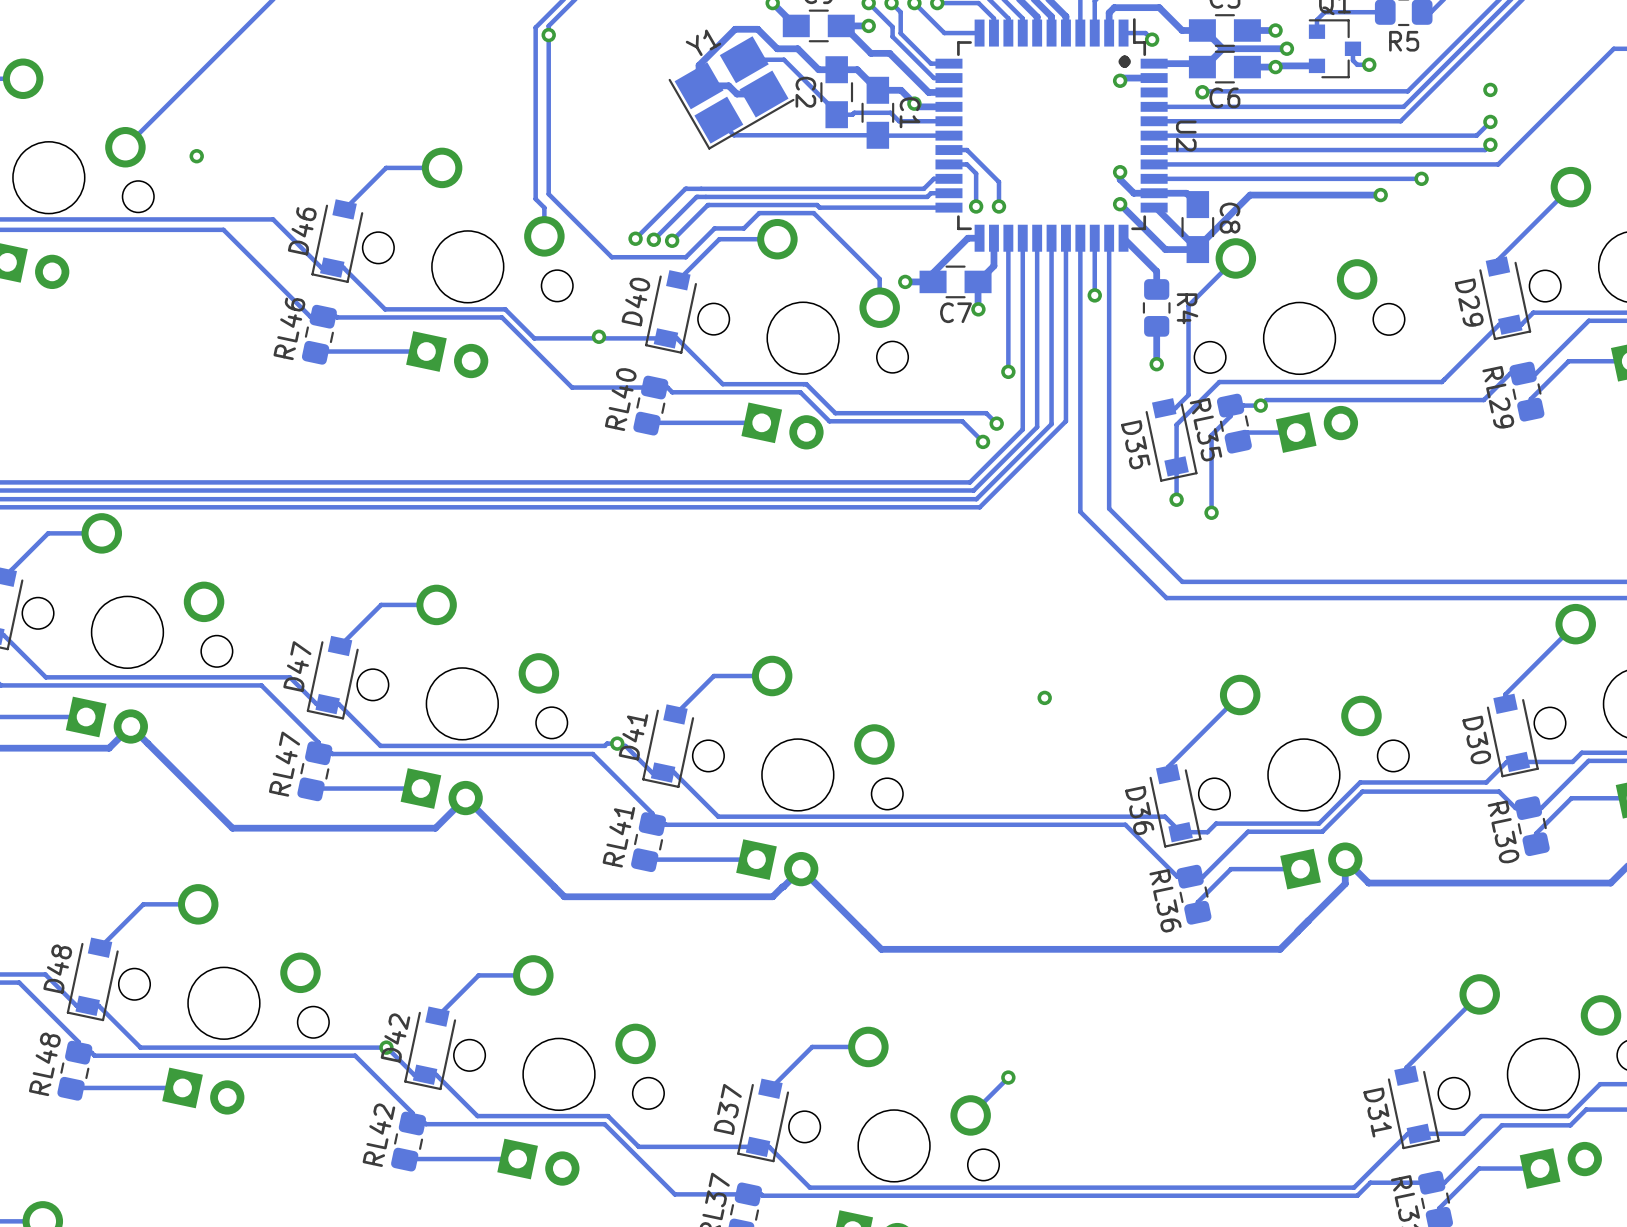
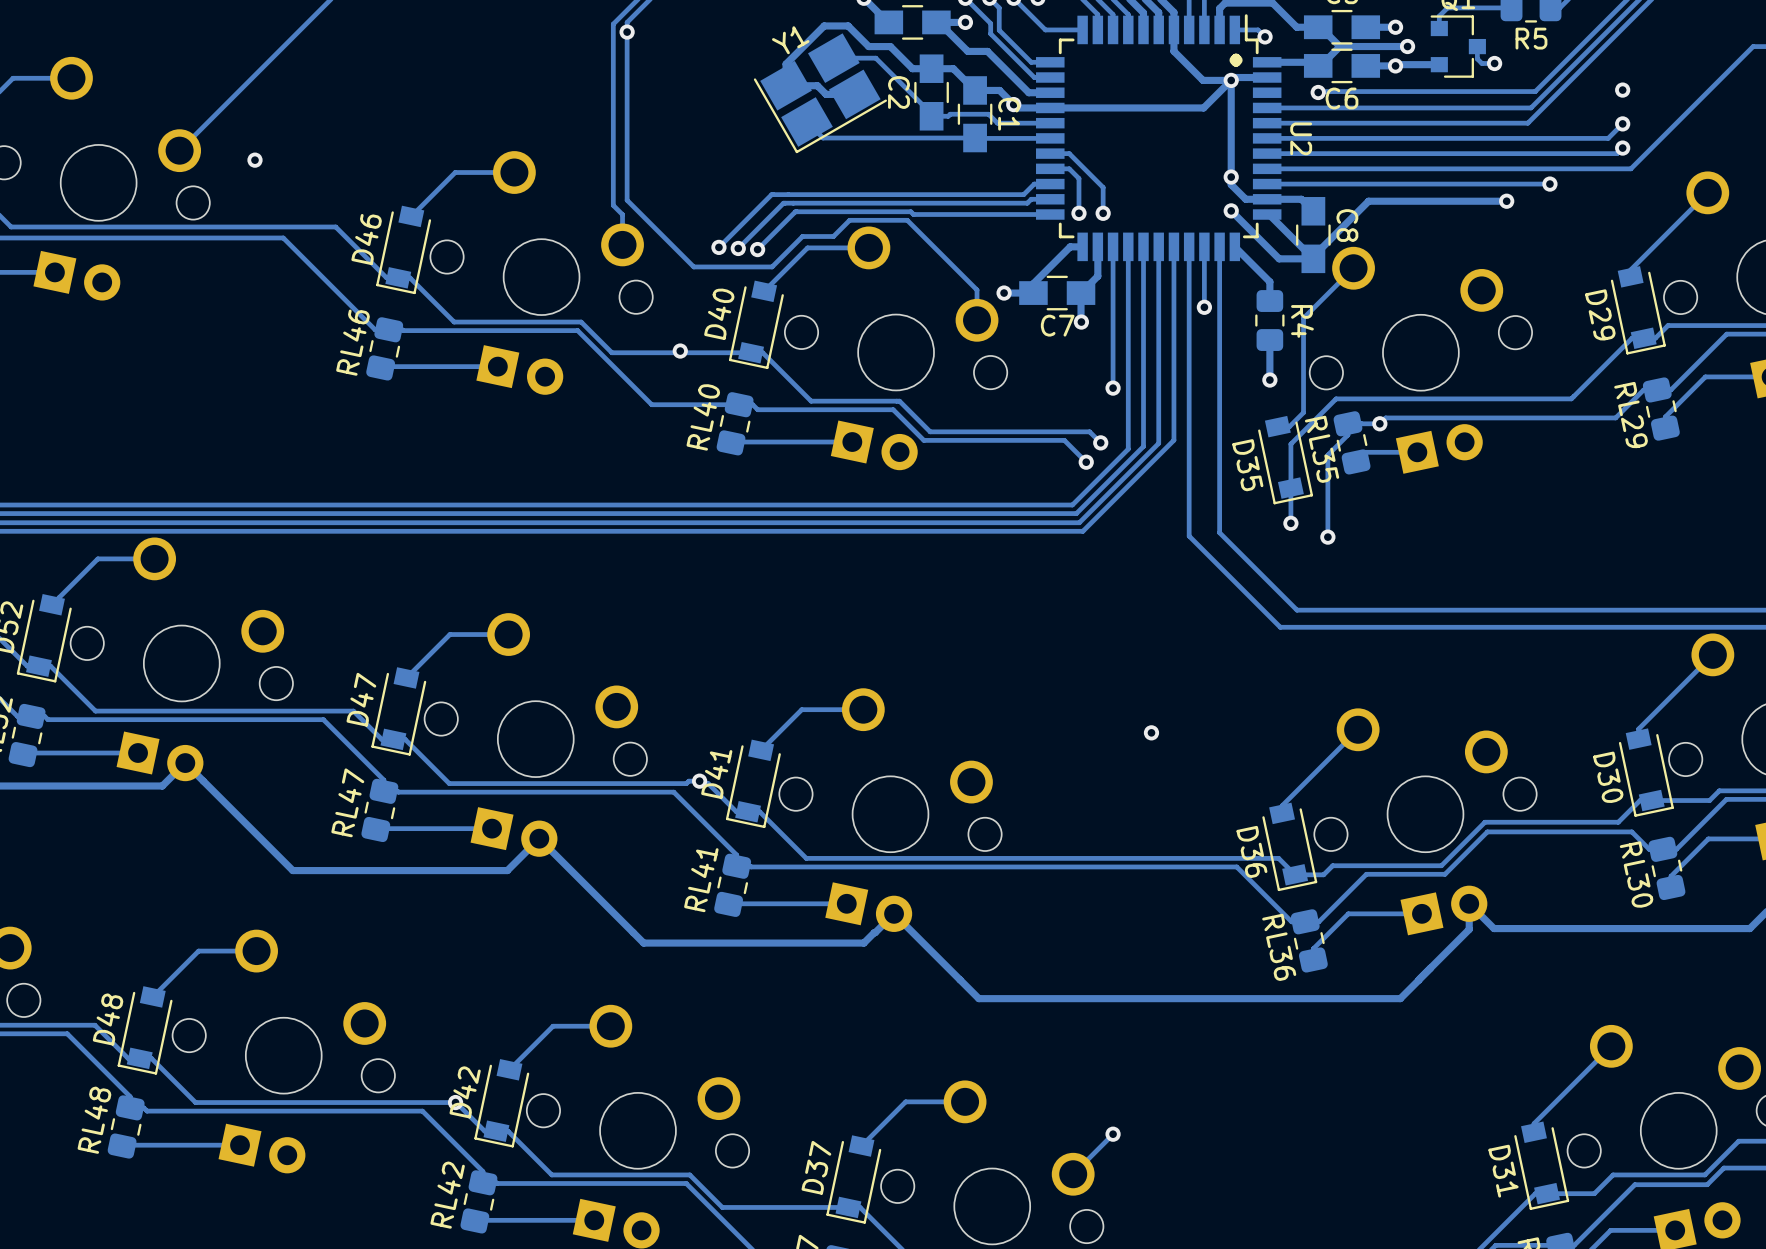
track: none -> (1173, 29) (1173, 51) (1203, 80) (1231, 80)
track: none -> (1231, 80) (1203, 107) (1050, 107)
track: none -> (1231, 80) (1231, 177)

